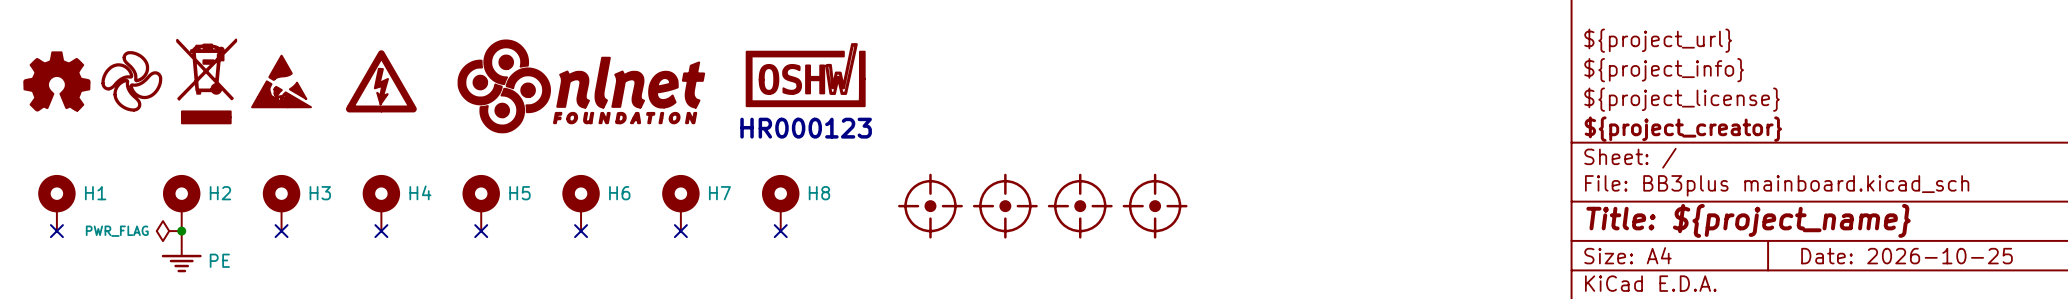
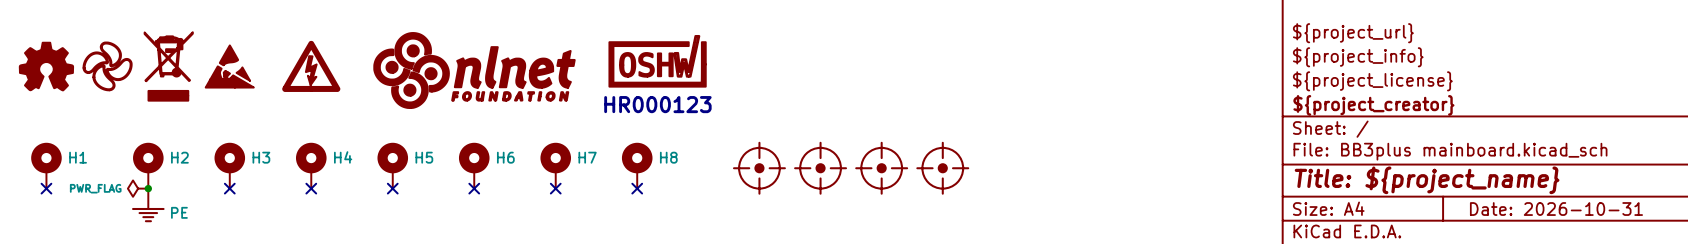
title block: Date: 2026-10-25 (1906, 256) -> Date: 2026-10-31 (1556, 209)

